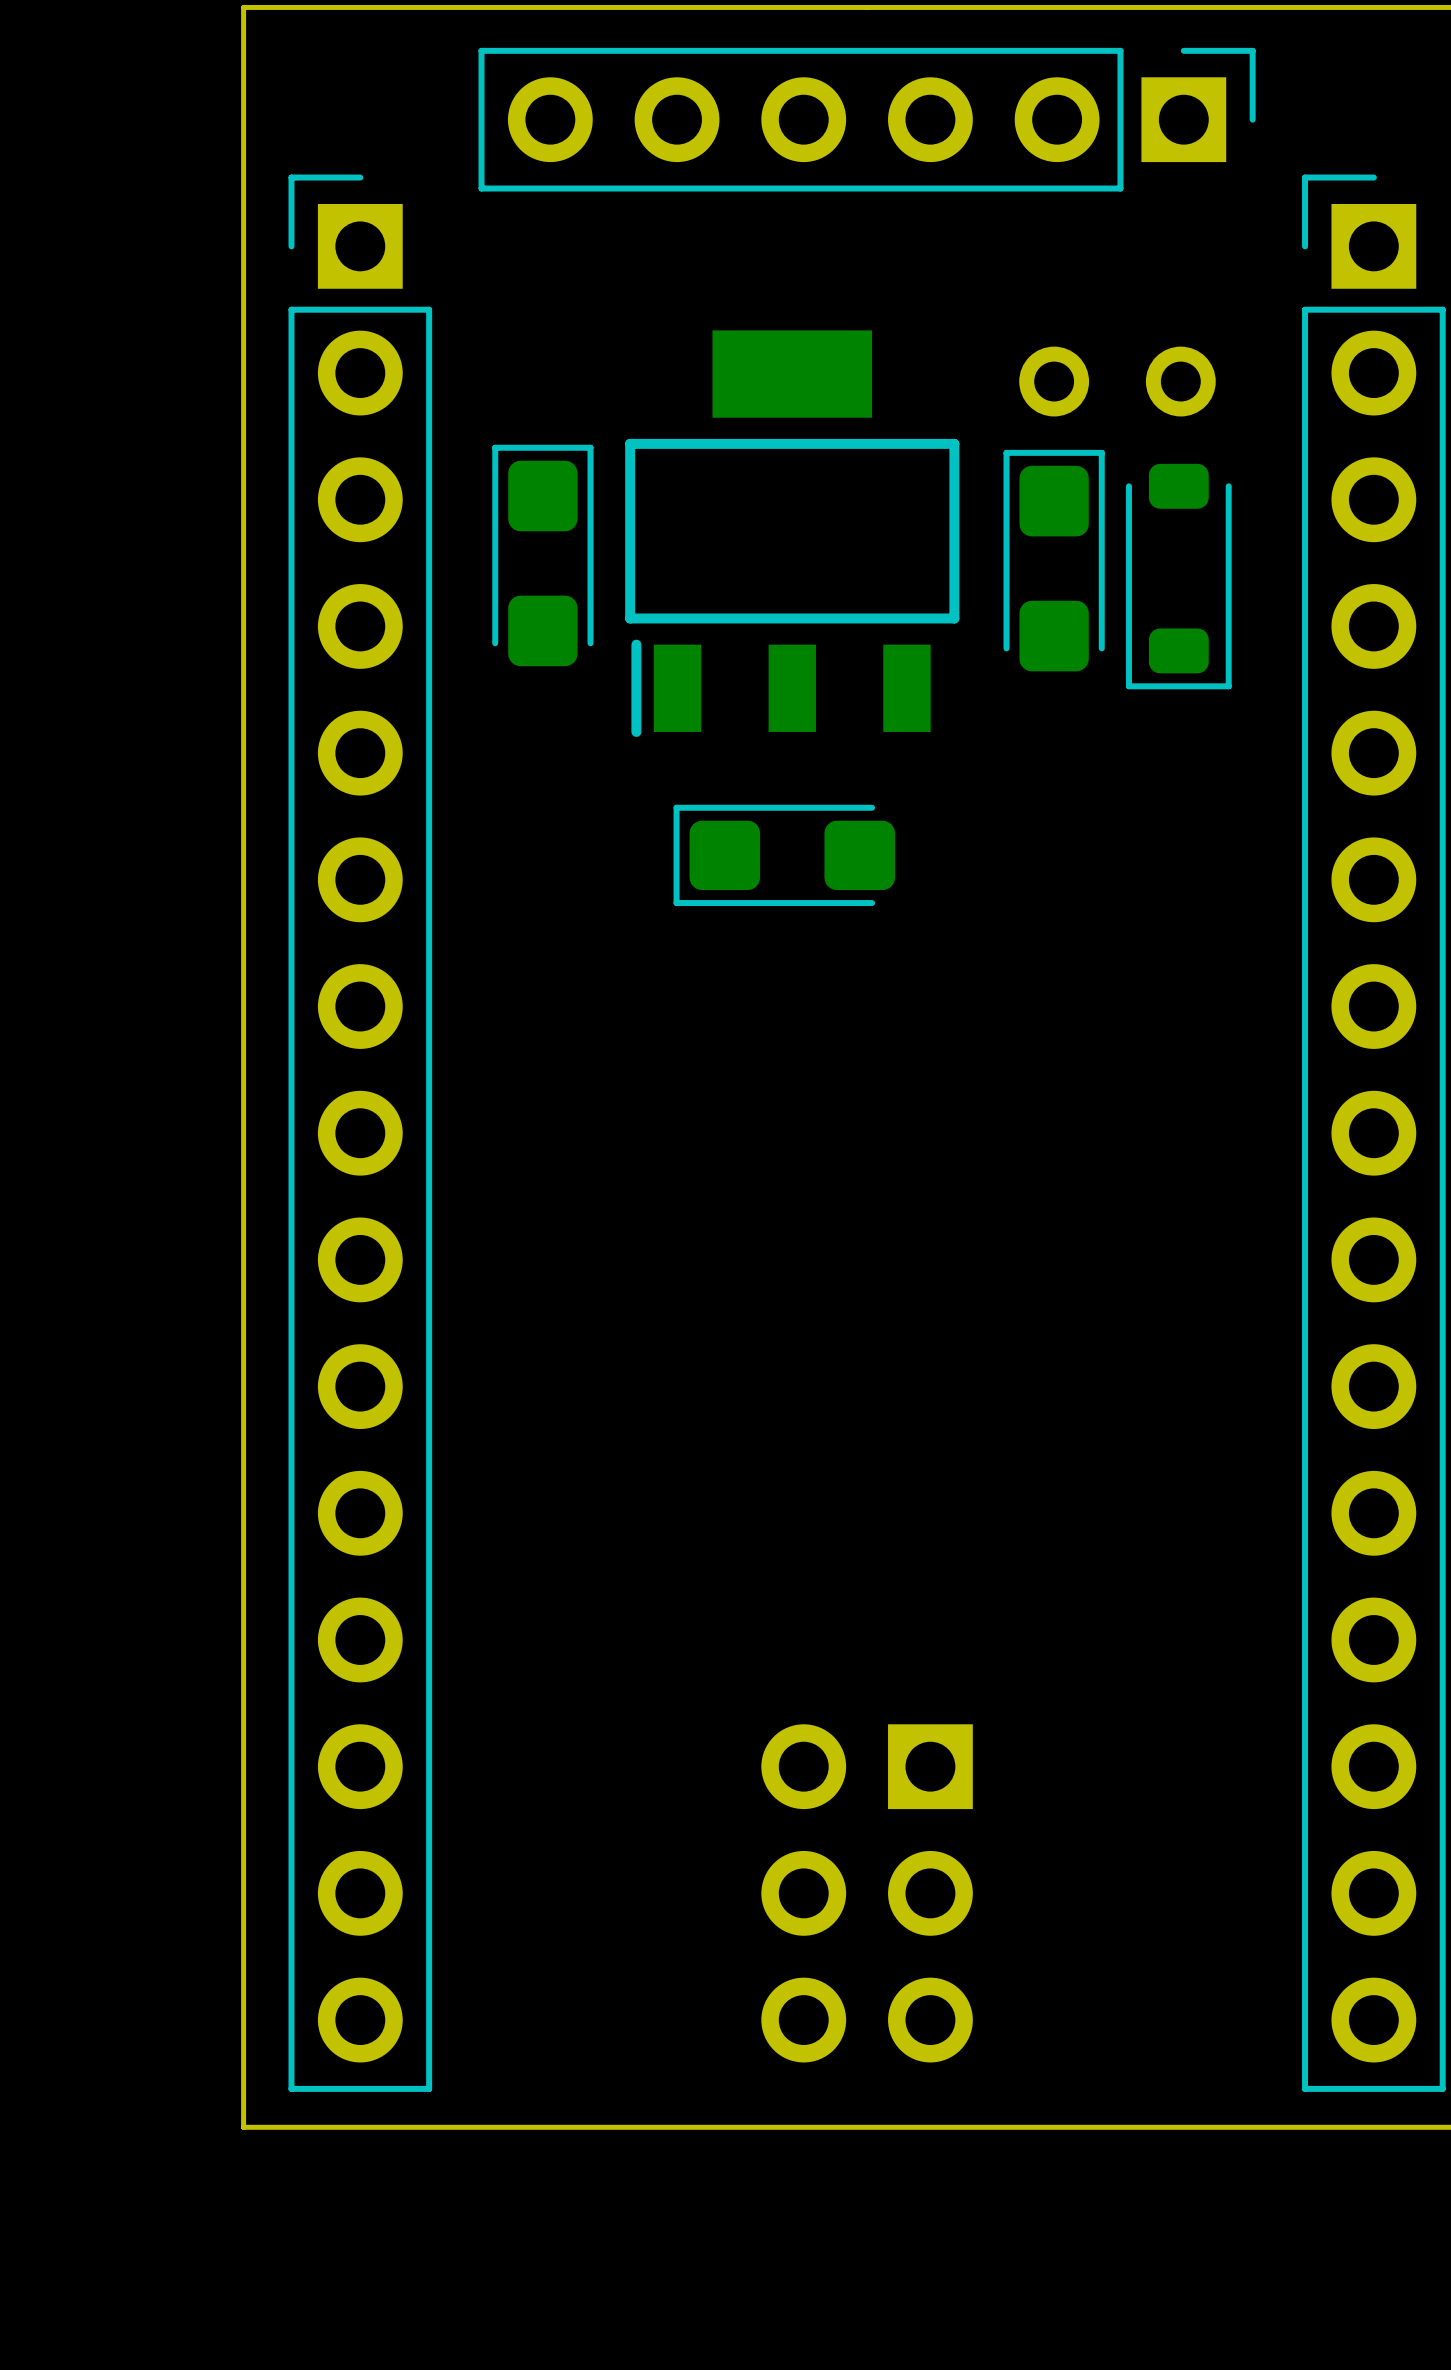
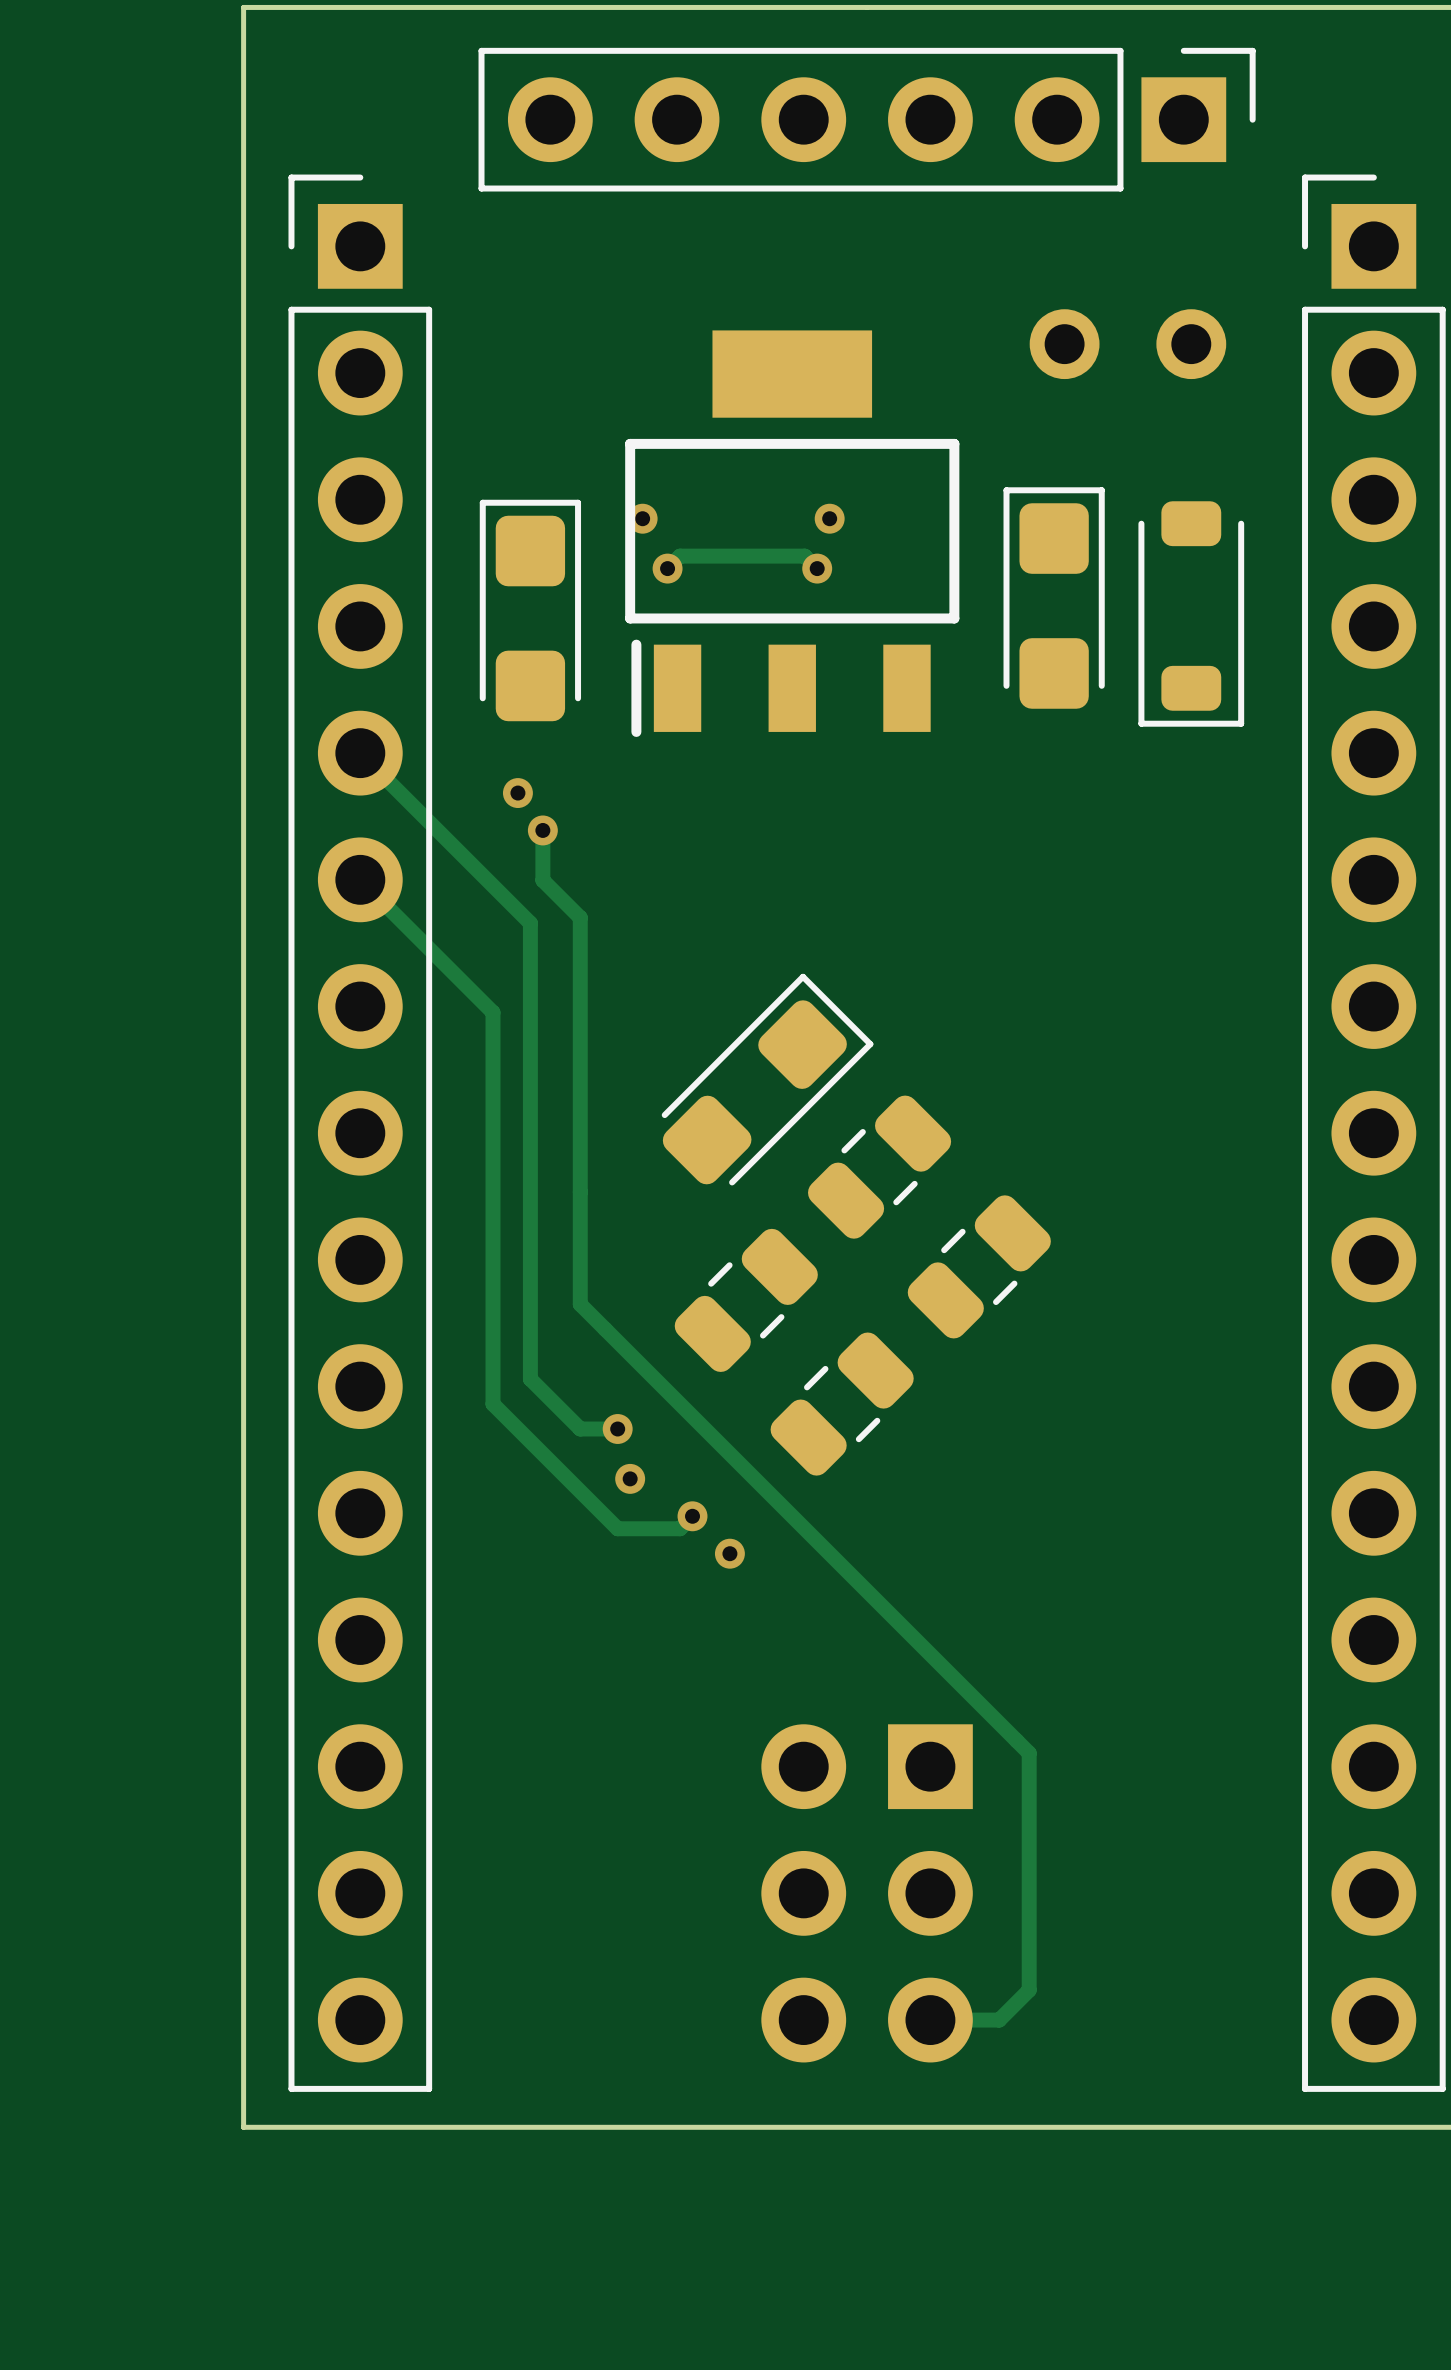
part position: (1117, 381) -> (1127, 344)
via: none -> (642, 518)
via: none -> (829, 518)
part position: (542, 555) -> (530, 610)
part position: (1054, 560) -> (1054, 598)
via: none -> (667, 568)
track: none -> (817, 568) (804, 556) (680, 556) (667, 568)
via: none -> (817, 568)
part position: (1178, 576) -> (1191, 613)
track: none -> (360, 753) (530, 923) (530, 1379) (580, 1429) (617, 1429)
via: none -> (517, 793)
track: none -> (542, 830) (542, 880) (580, 917) (580, 1304) (1029, 1753) (1029, 1990) (999, 2020) (930, 2020)
via: none -> (542, 830)
part: (784, 855) -> none
track: none -> (360, 879) (492, 1012) (492, 1404) (617, 1528) (680, 1528) (692, 1516)
part: none -> (767, 1079)
part: none -> (879, 1167)
part: none -> (979, 1266)
part: none -> (746, 1300)
part: none -> (842, 1404)
via: none -> (617, 1429)
via: none -> (630, 1478)
via: none -> (692, 1516)
via: none -> (729, 1553)

